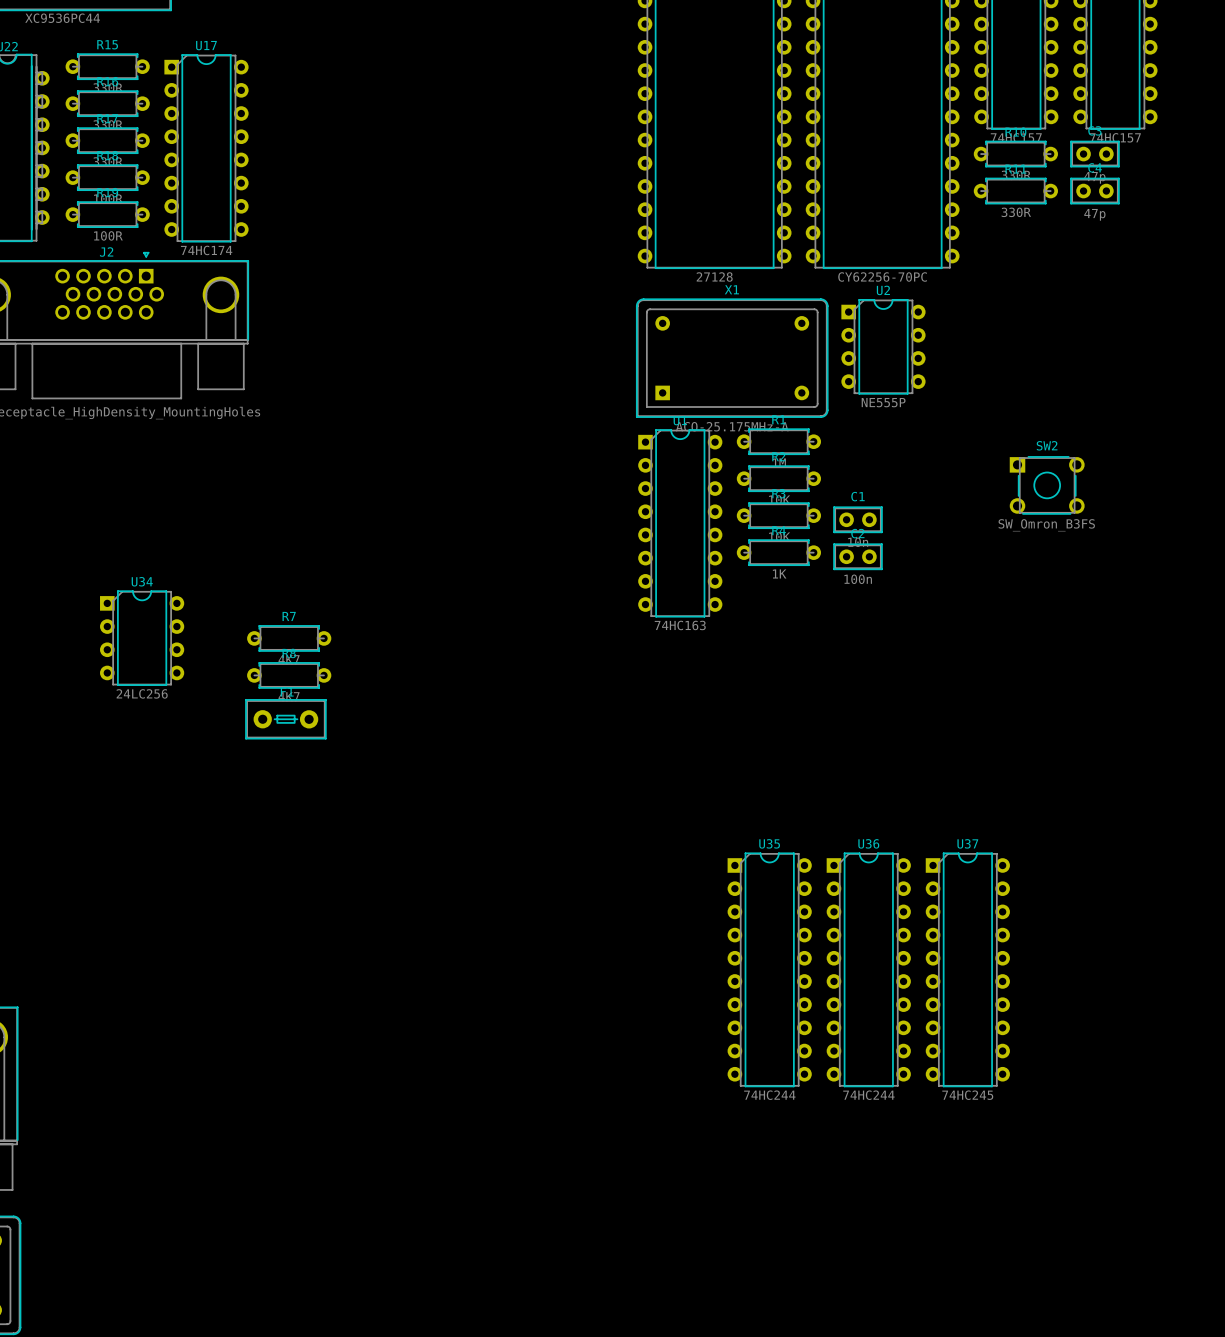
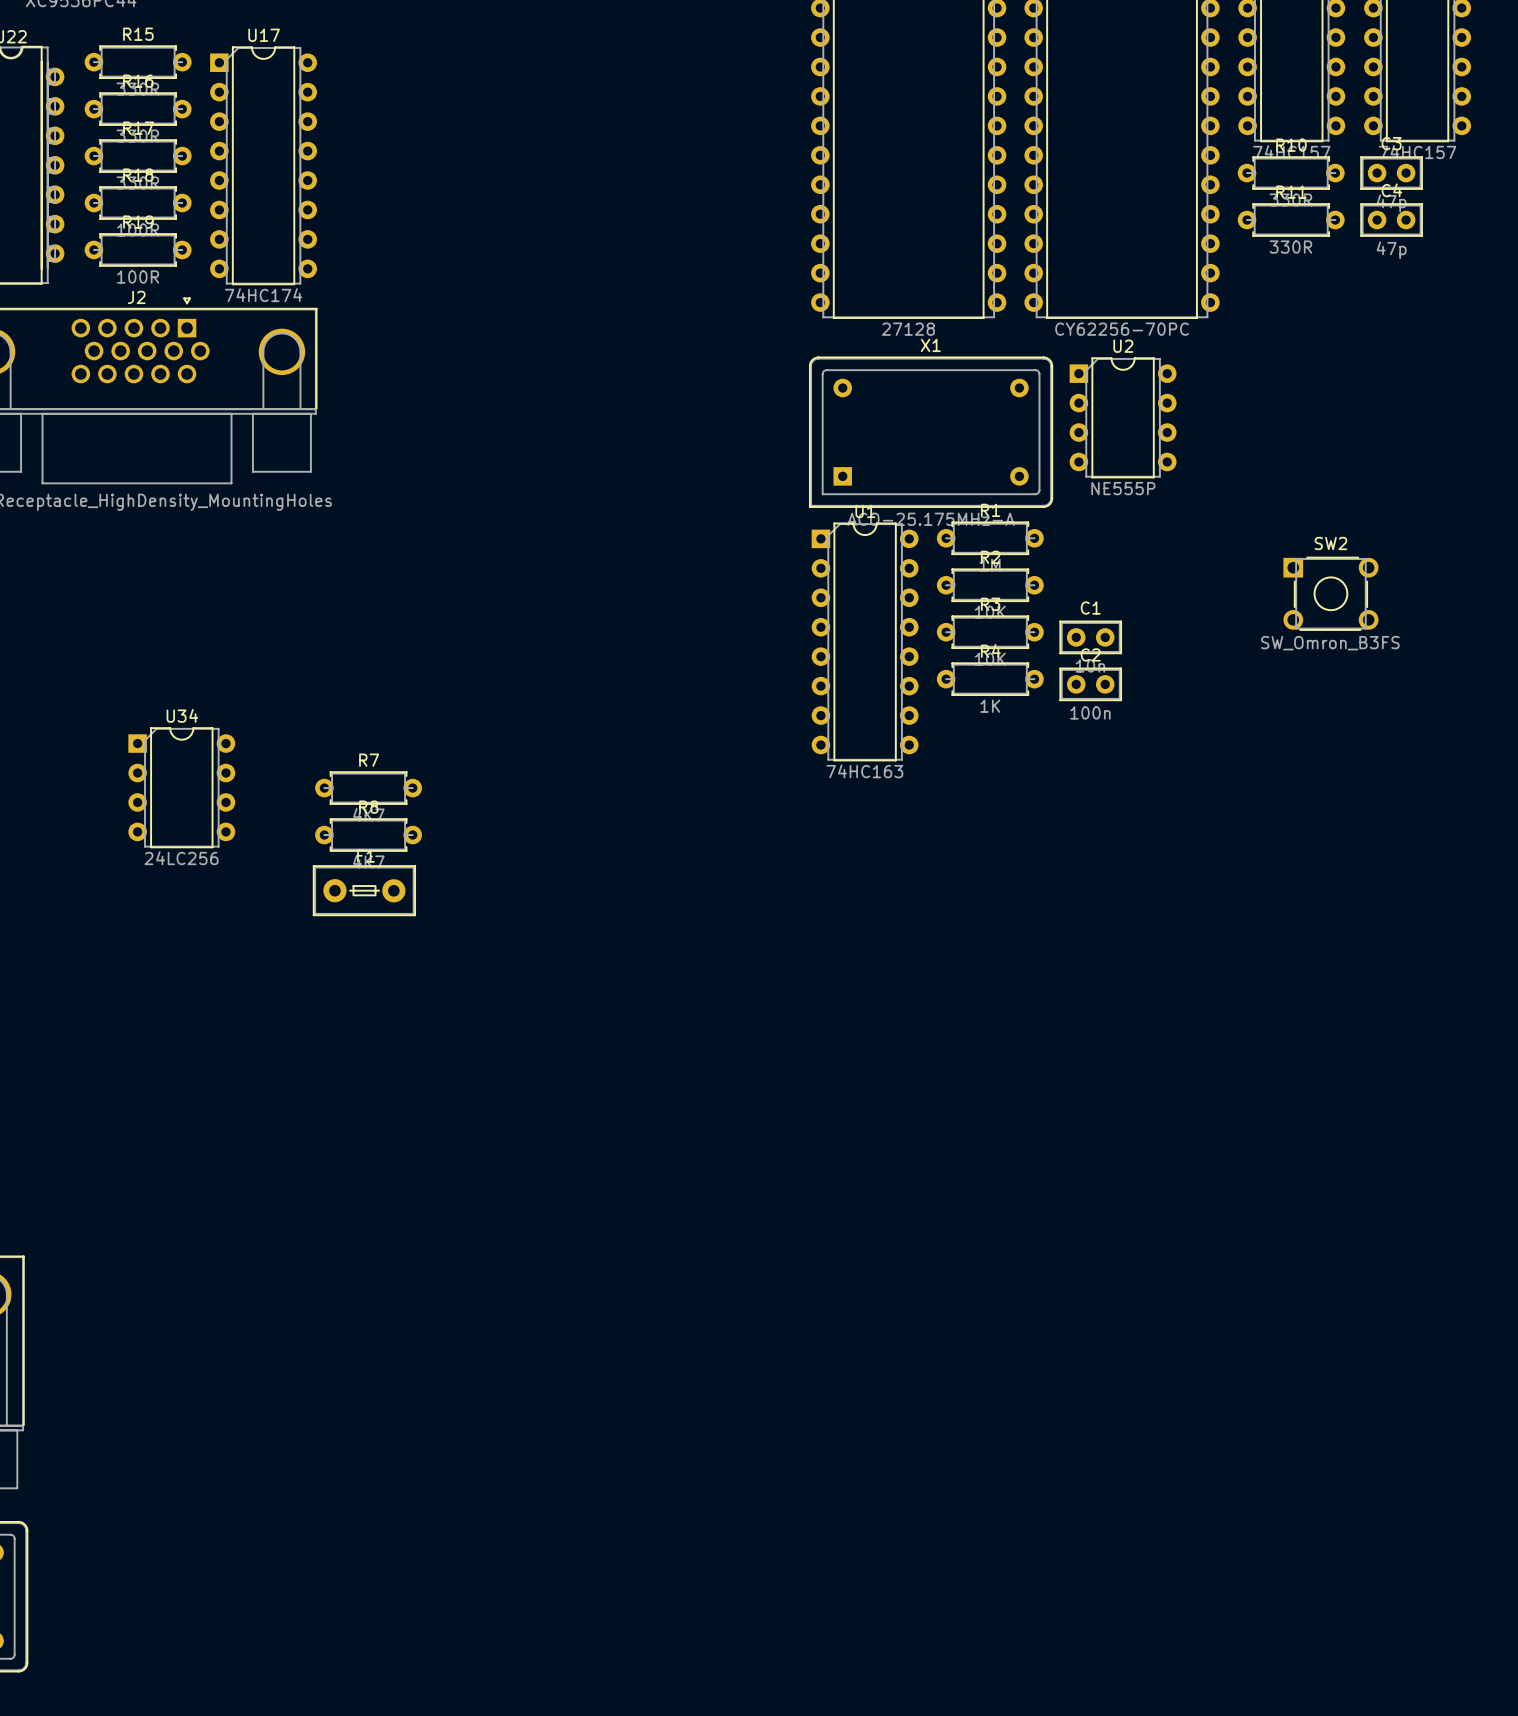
U35: 74HC244 (769, 969) -> none
U36: 74HC244 (868, 969) -> none
U37: 74HC245 (967, 969) -> none

